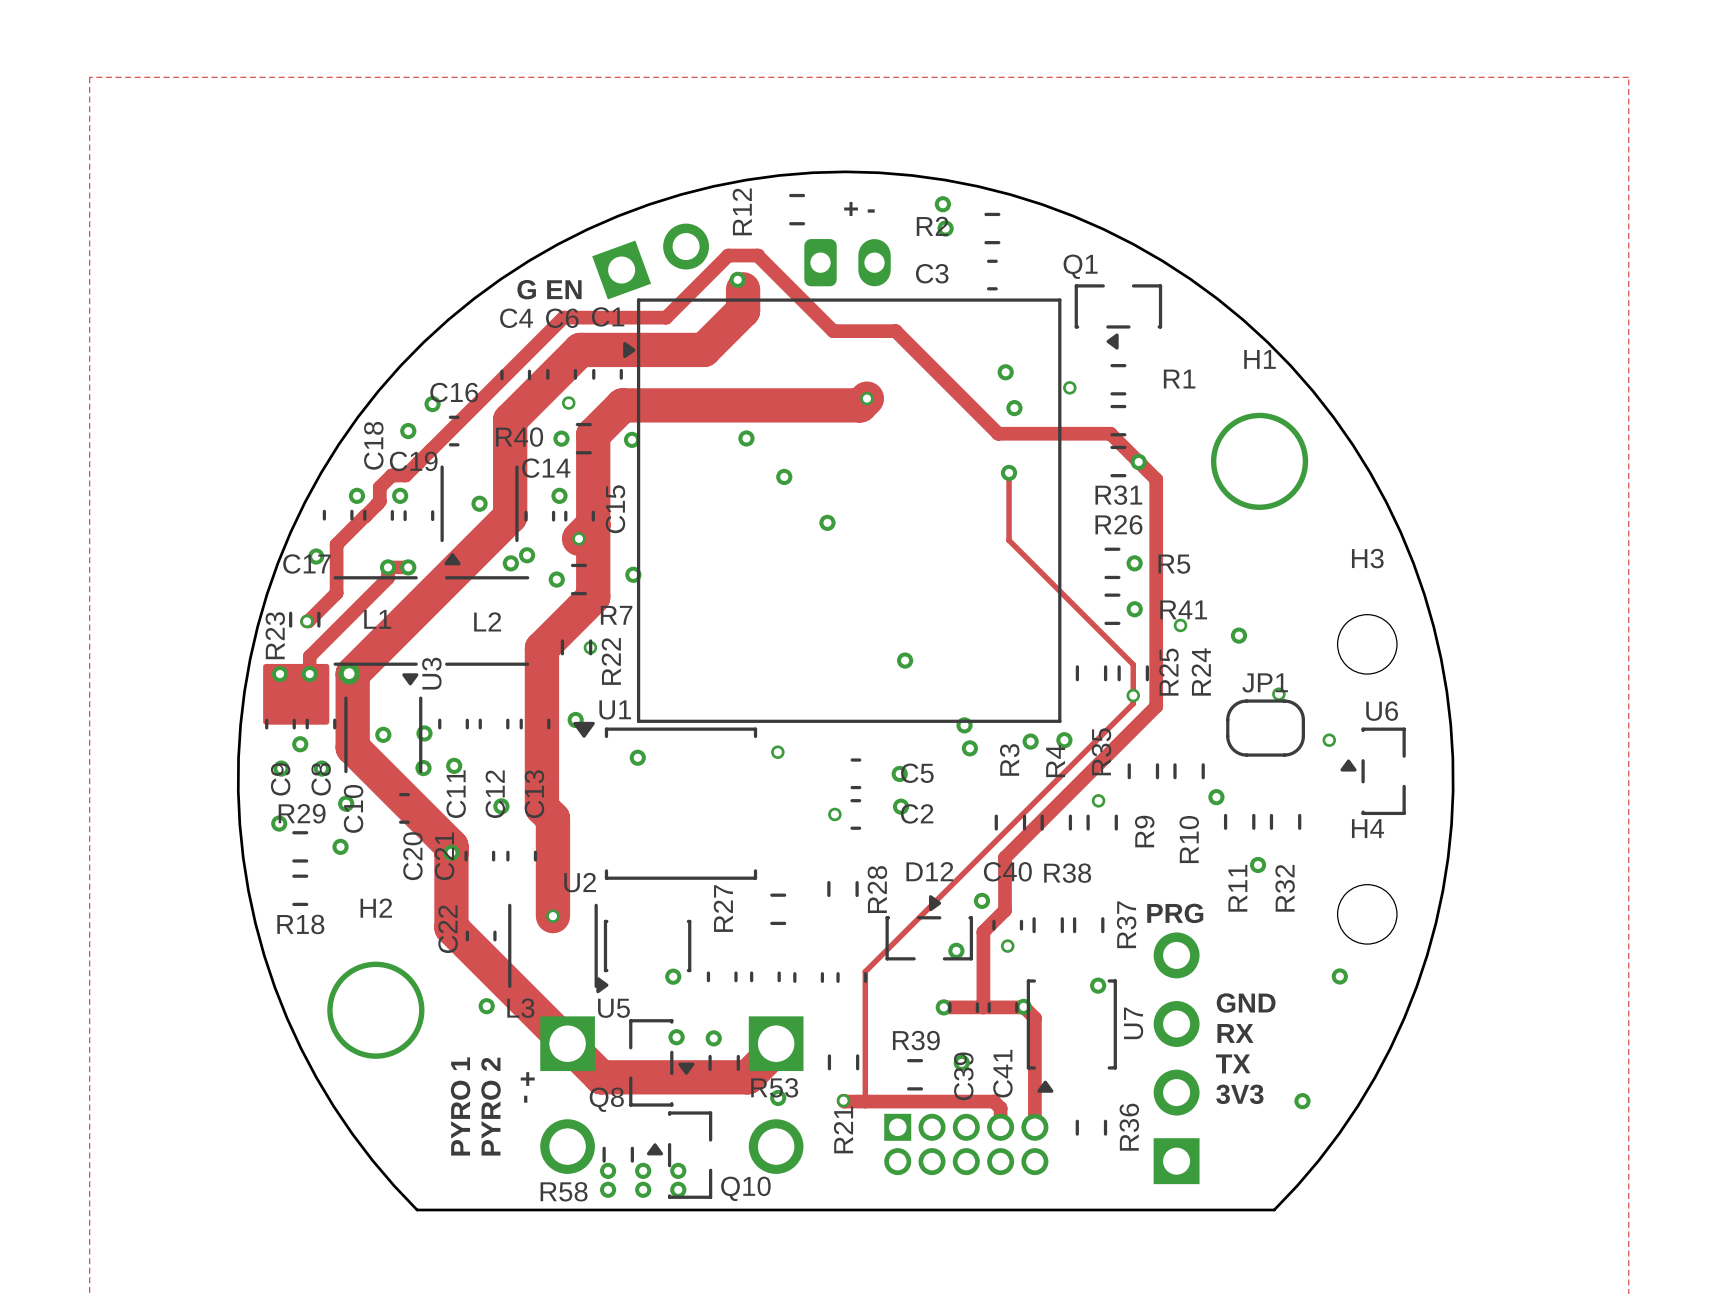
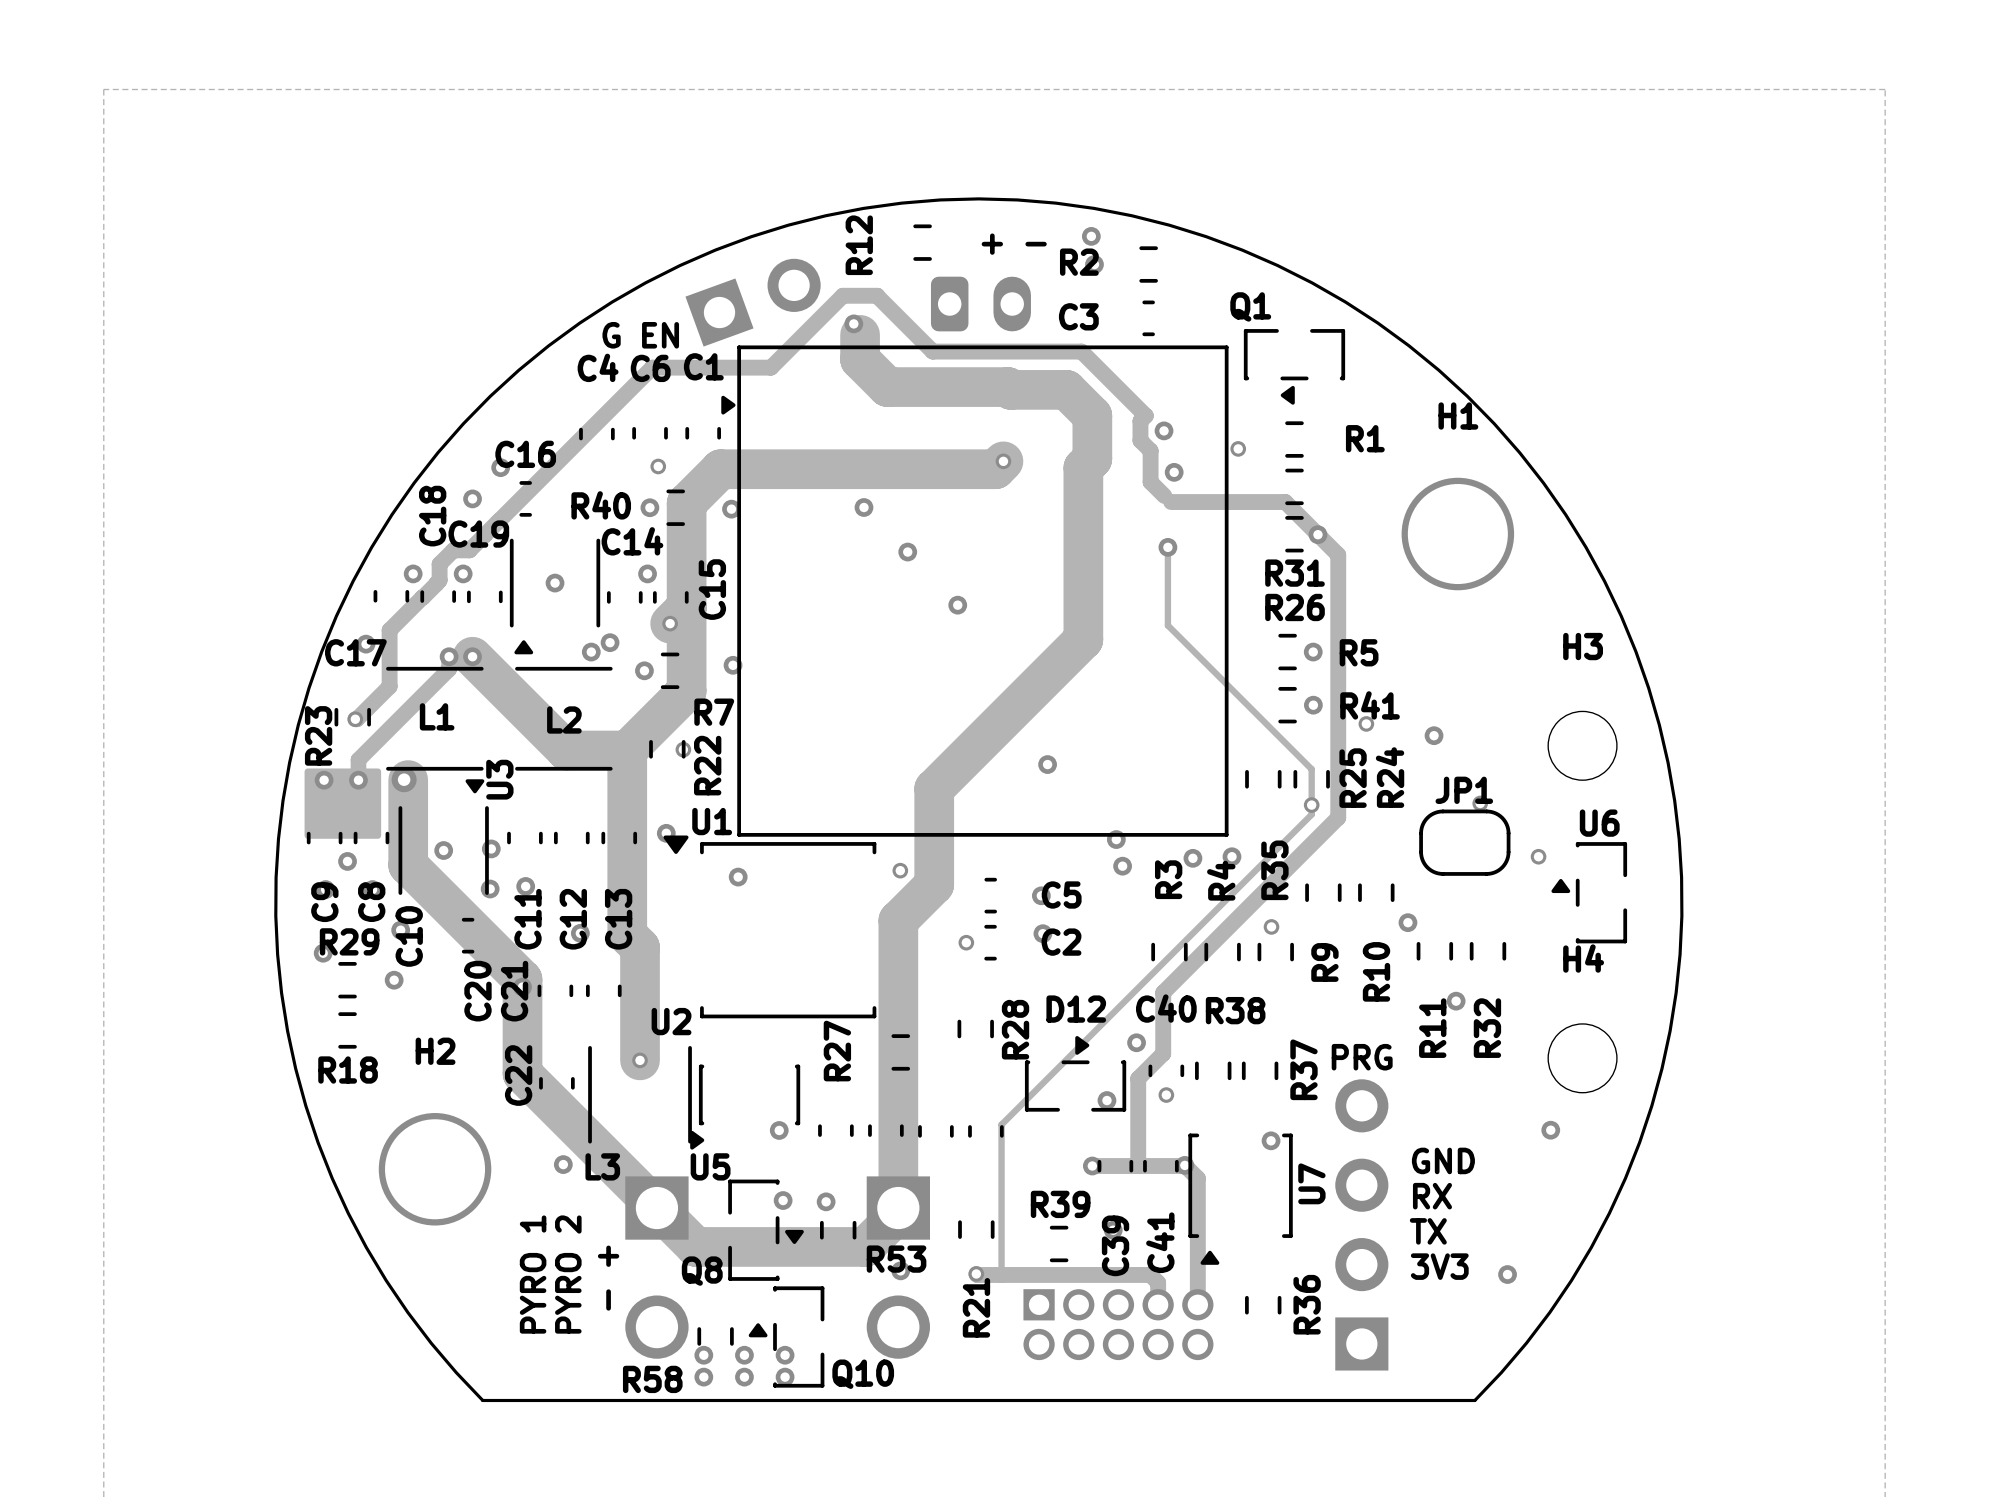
track: (805, 303) (833, 331) (895, 331) (998, 433) (1011, 433) -> (932, 351) (1081, 351) (1145, 415) (1140, 421) (1140, 440) (1150, 450) (1150, 482) (1164, 495)
track: (743, 310) (703, 349) (580, 349) (510, 420) (510, 516) (352, 673) -> (860, 359) (887, 387) (1008, 387) (1010, 389) (1066, 389) (1092, 415) (1092, 458) (1083, 467) (1083, 639) (934, 788) (934, 884) (898, 920) (898, 1208)
track: none -> (472, 656) (566, 750) (627, 750)

